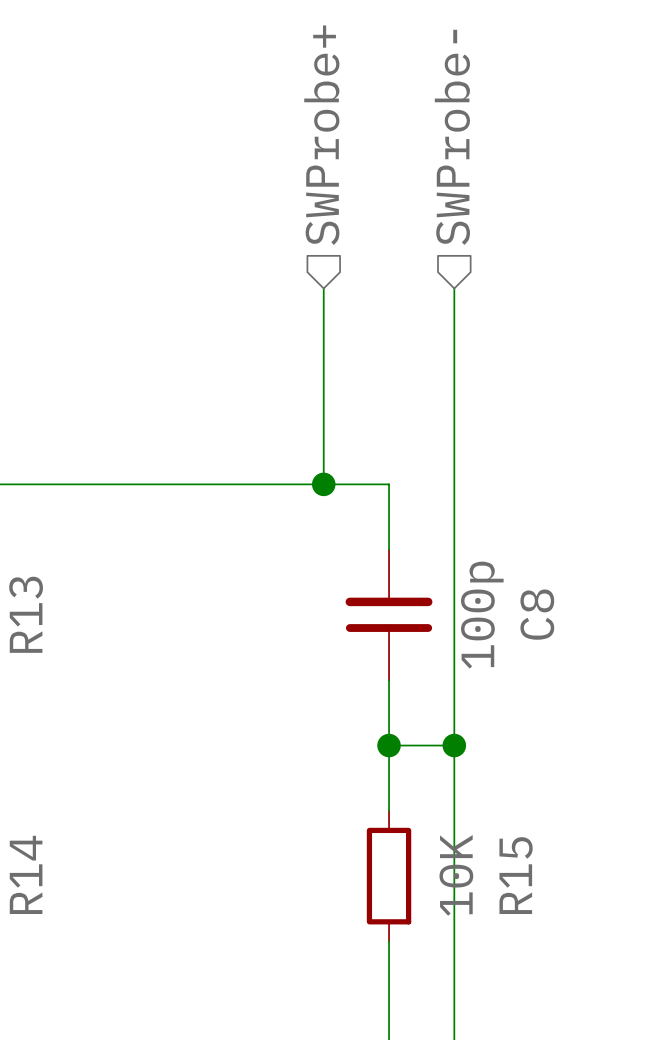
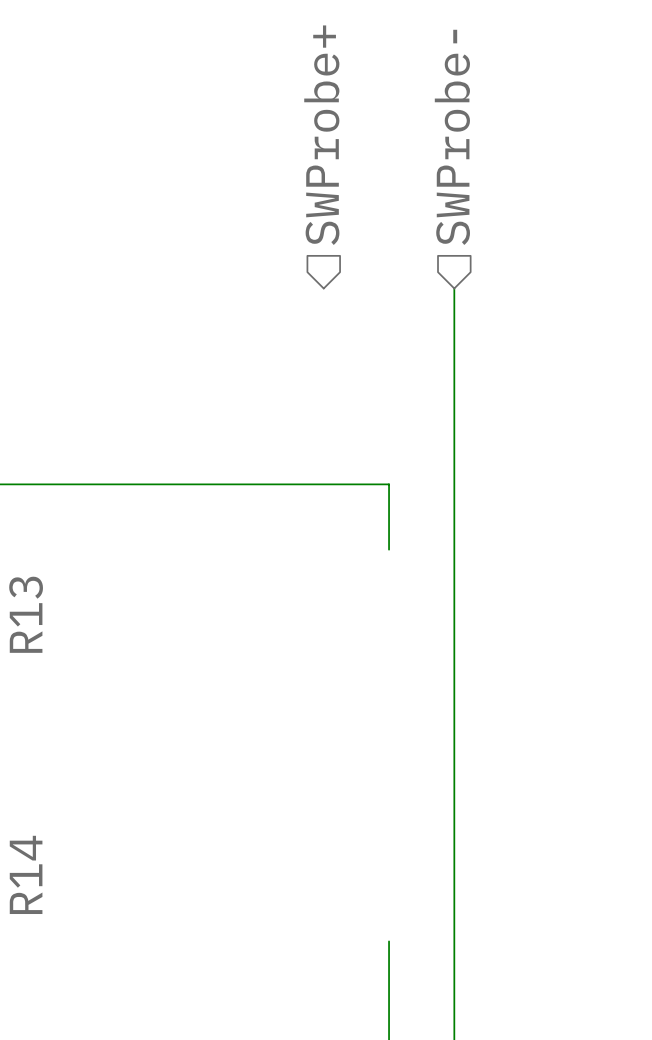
wire: (323, 288) (323, 484) -> none
junction: (323, 484) -> none
C8: 100p (389, 614) -> none
wire: (389, 680) (389, 810) -> none
wire: (389, 745) (454, 745) -> none
junction: (389, 745) -> none
junction: (454, 745) -> none
R15: 10K (389, 876) -> none

